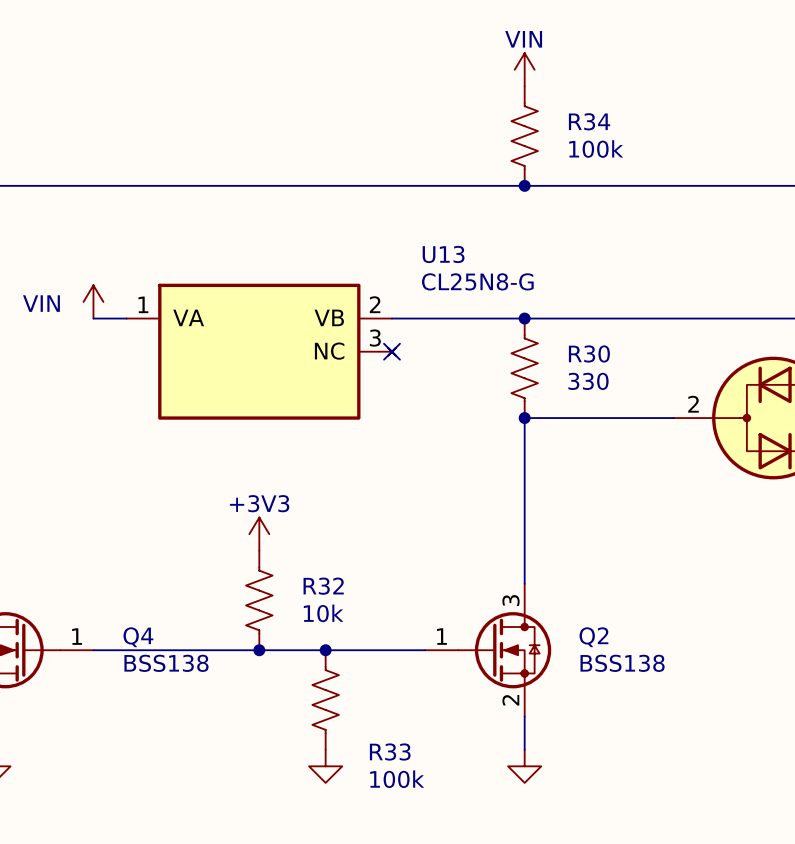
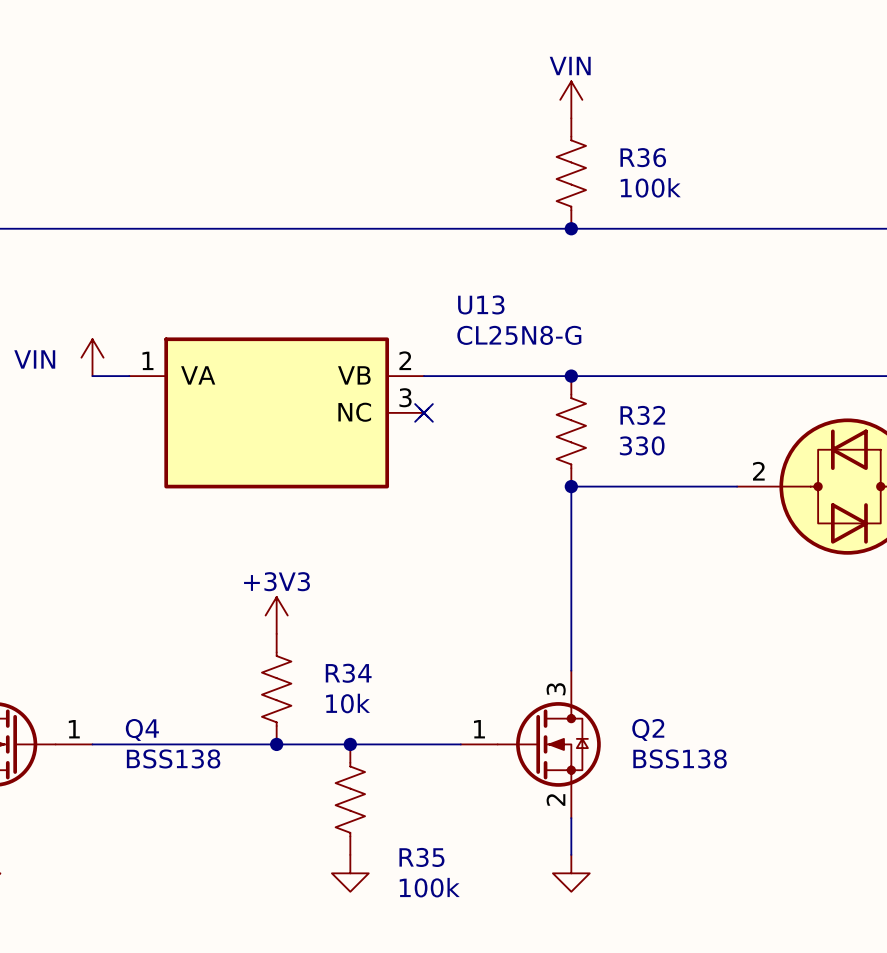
R34 name: R34 (589, 121) -> R36 (643, 157)
R30 name: R30 (589, 353) -> R32 (642, 415)
R32 name: R32 (323, 586) -> R34 (348, 673)
R33 name: R33 (390, 752) -> R35 (421, 857)

